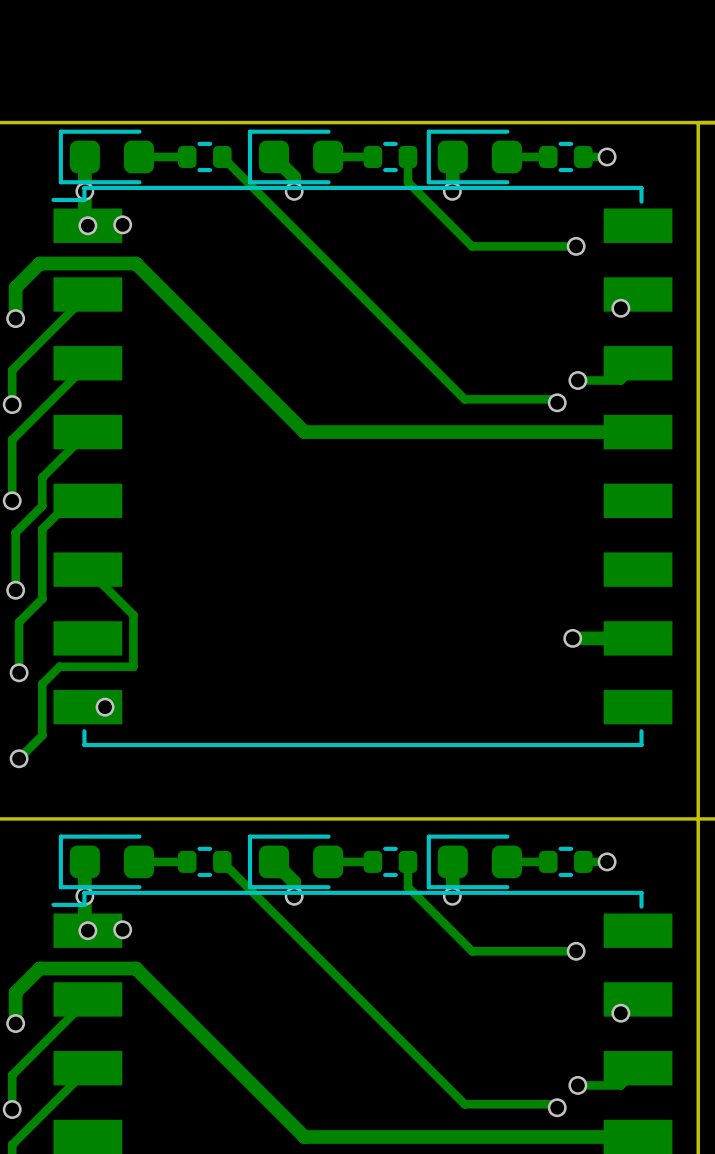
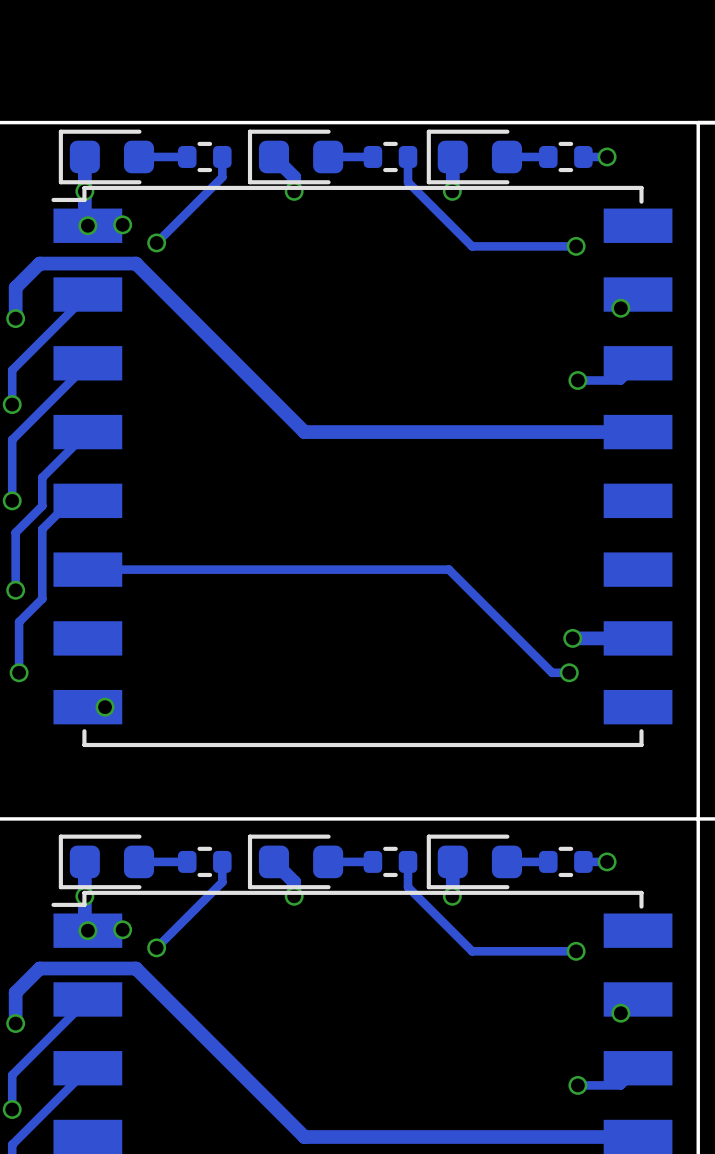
track: (222, 156) (464, 399) (553, 399) (557, 402) -> (222, 156) (222, 177) (156, 242)
via: none -> (156, 242)
via: (557, 402) -> none
track: (87, 569) (133, 615) (133, 666) (59, 666) (42, 683) (42, 735) (19, 758) -> (87, 569) (448, 569) (552, 672) (569, 672)
via: none -> (569, 672)
via: (19, 758) -> none
track: (222, 861) (464, 1104) (553, 1104) (557, 1107) -> (222, 861) (222, 882) (156, 947)
via: none -> (156, 947)
via: (557, 1107) -> none

